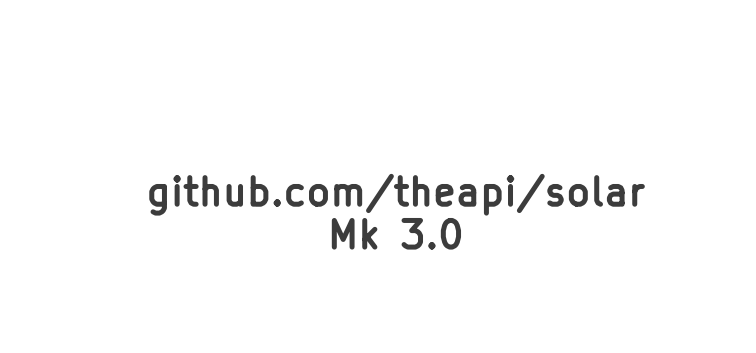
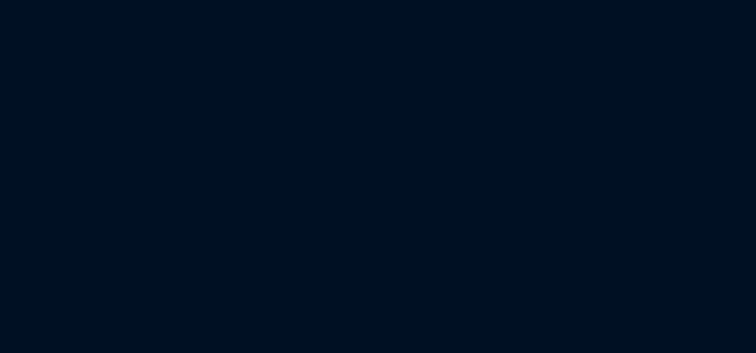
text: github.com/theapi/solar (397, 194) -> none
text: Mk 3.0 (396, 233) -> none

